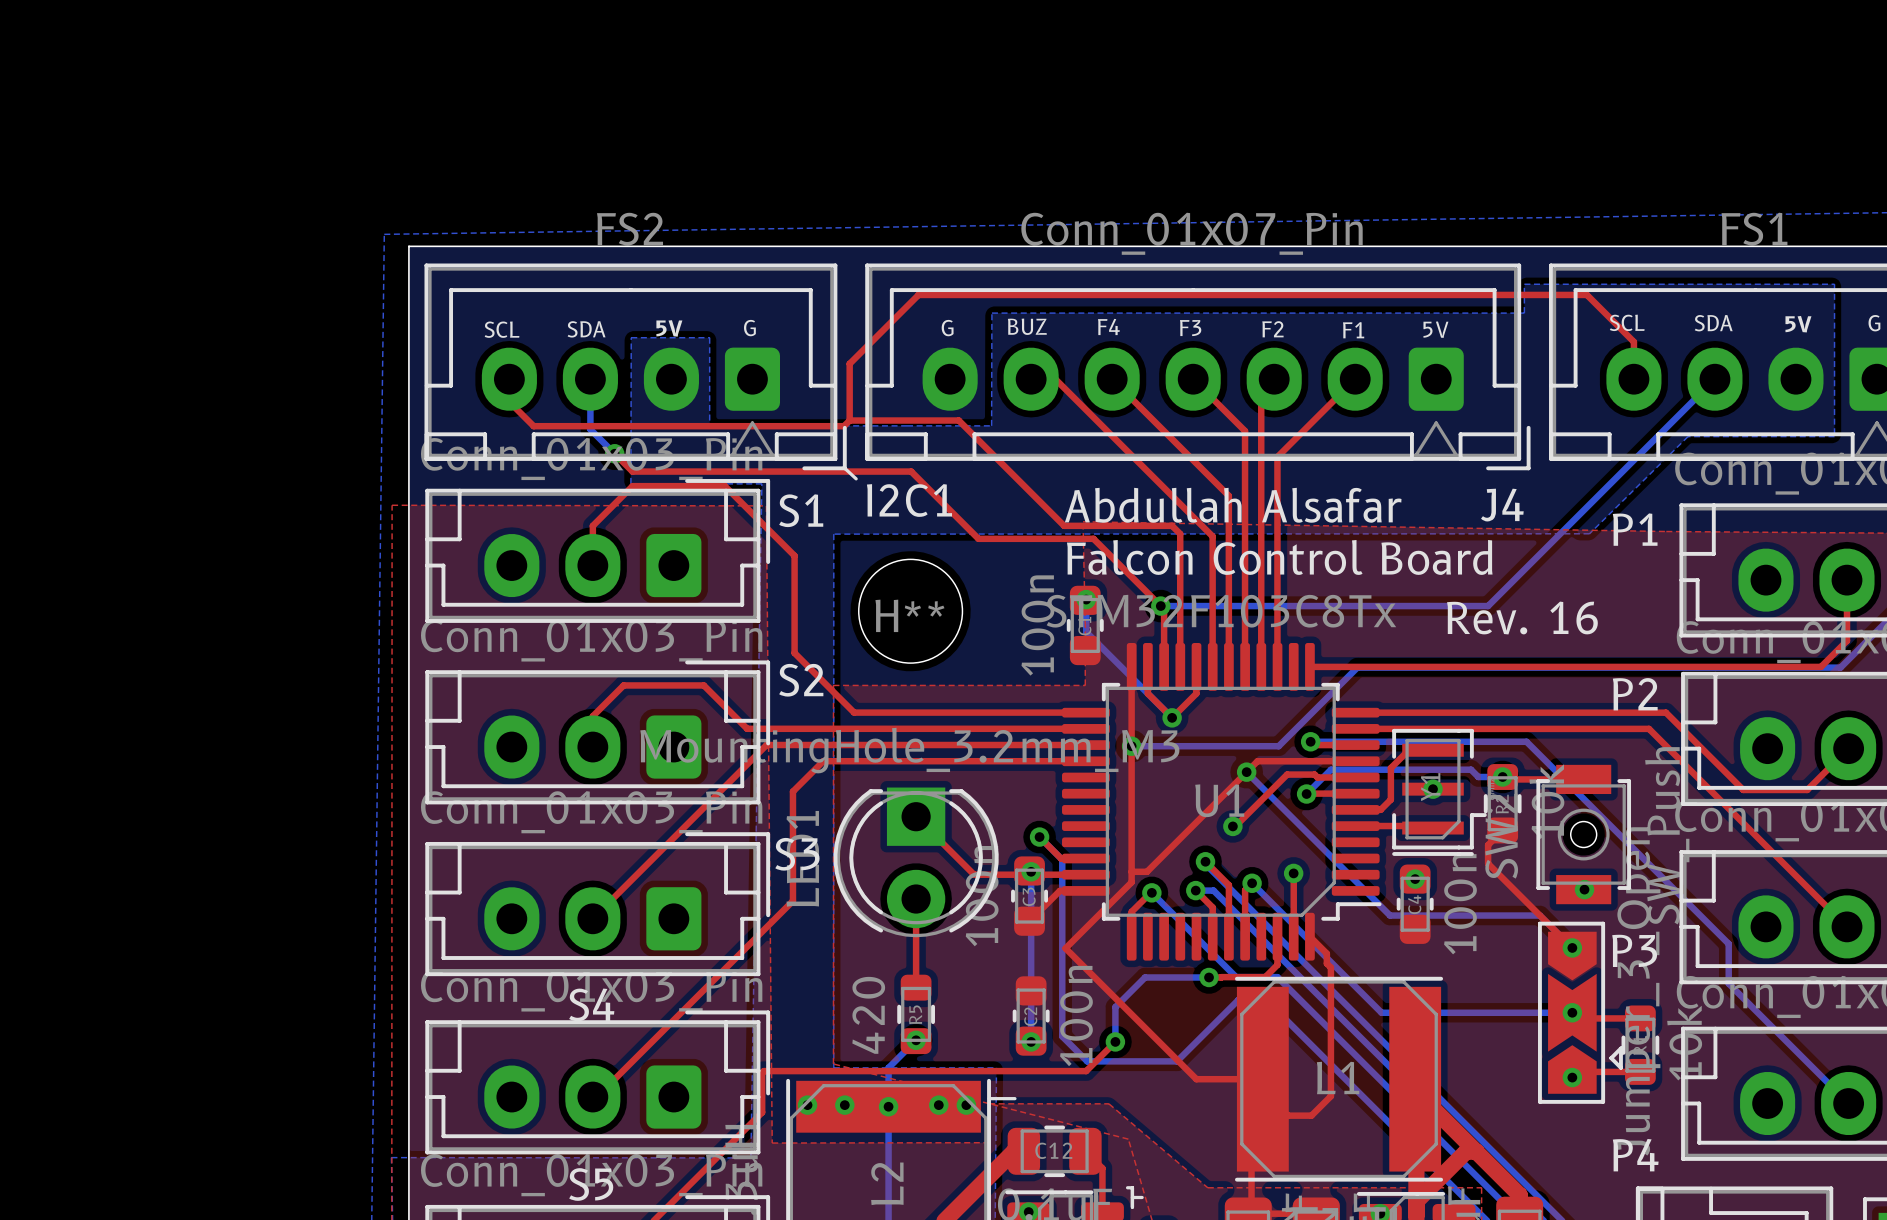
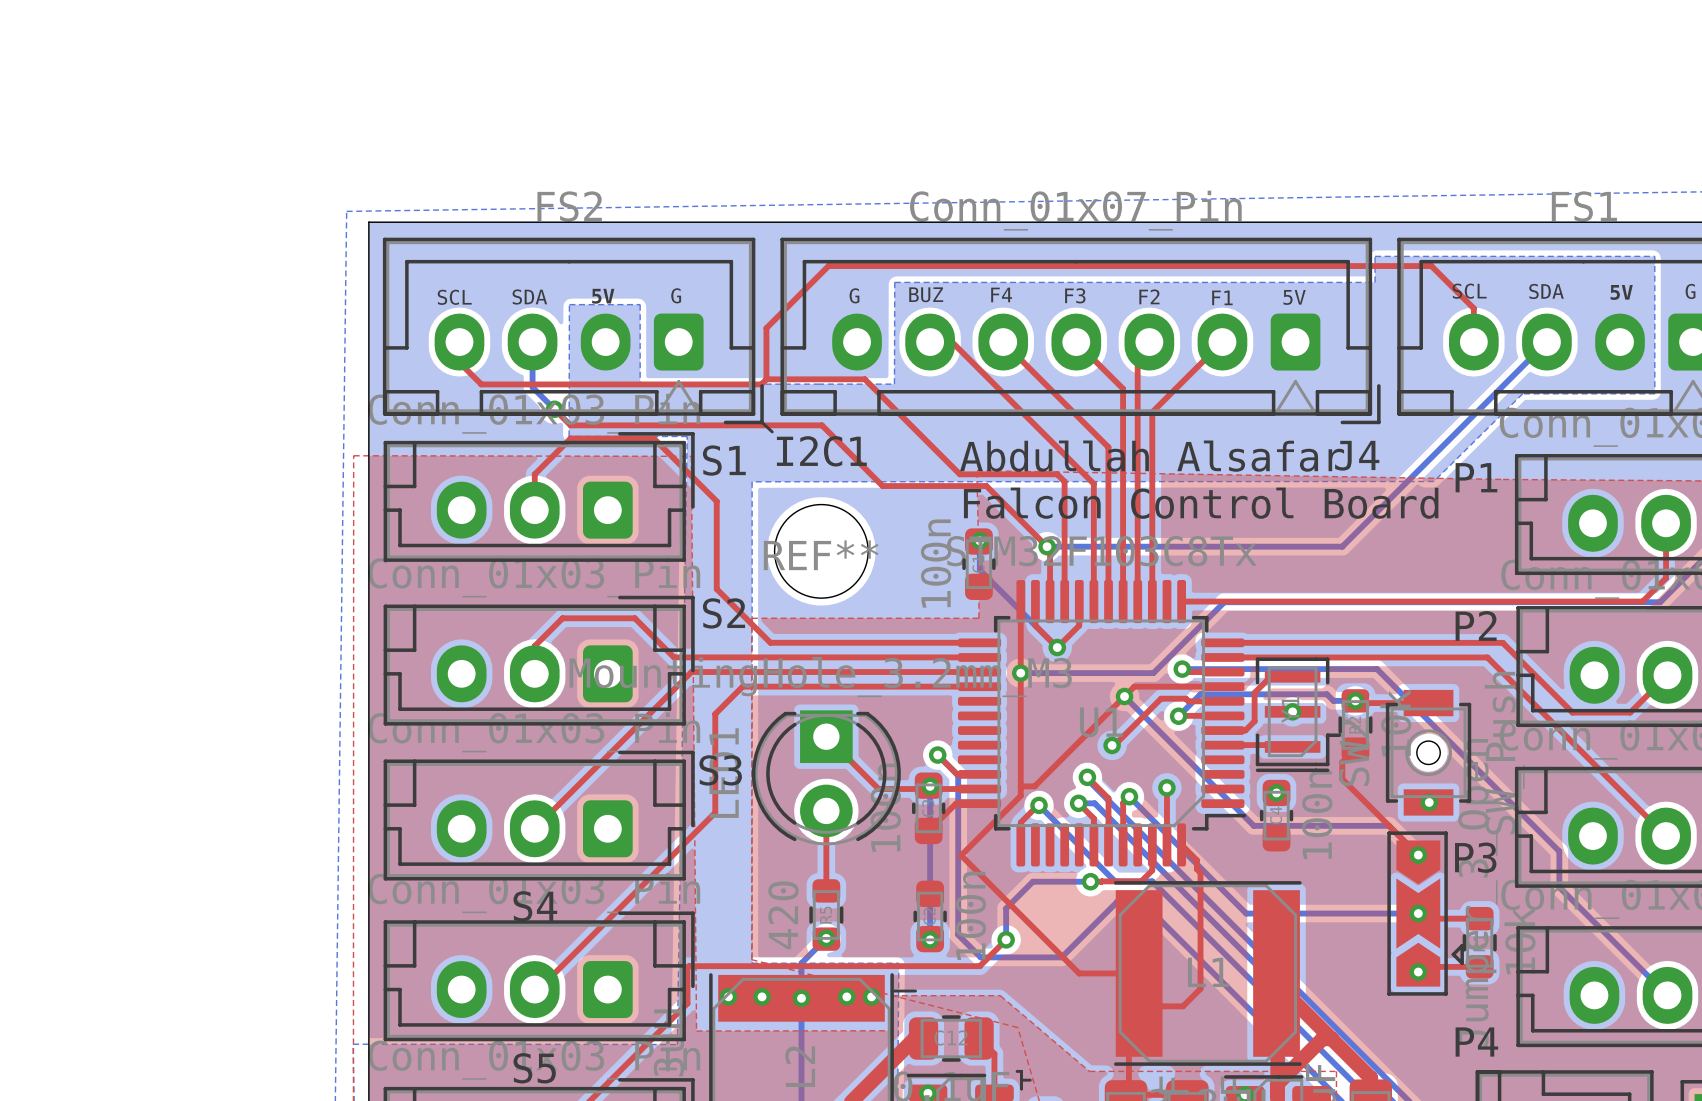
H** name: H** (909, 615) -> REF** (821, 555)
text: Rev. 16 (1522, 618) -> none

